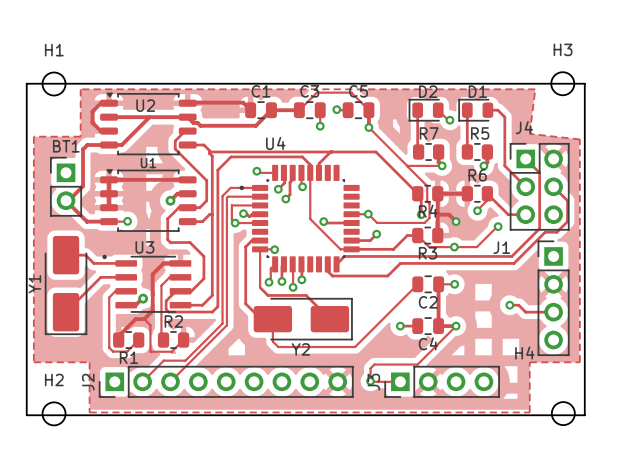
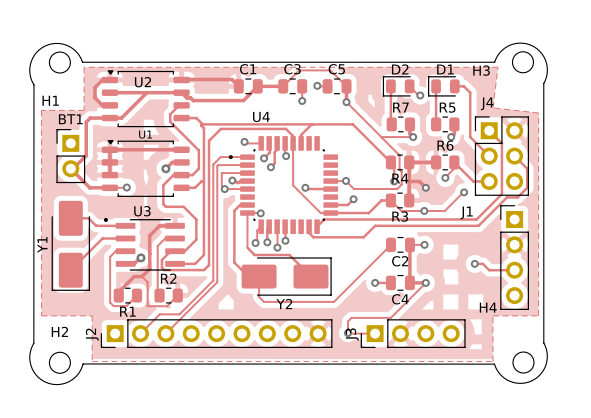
H3 name position: H3 (563, 49) -> H3 (481, 70)
H1 name position: H1 (54, 50) -> H1 (50, 100)
board edge: (78, 83) (26, 83) (26, 415) (584, 415) (584, 83) (531, 83) -> (82, 62) (72, 48) (55, 43) (45, 45) (36, 52) (29, 68) (33, 84) (33, 343) (29, 359) (32, 368) (38, 377) (46, 382) (56, 384) (65, 383) (74, 378) (83, 363) (494, 364) (499, 373) (510, 381) (524, 383) (536, 377) (545, 366) (547, 356) (543, 343) (543, 83) (547, 66) (539, 51) (524, 43) (514, 43) (504, 48) (494, 62)

